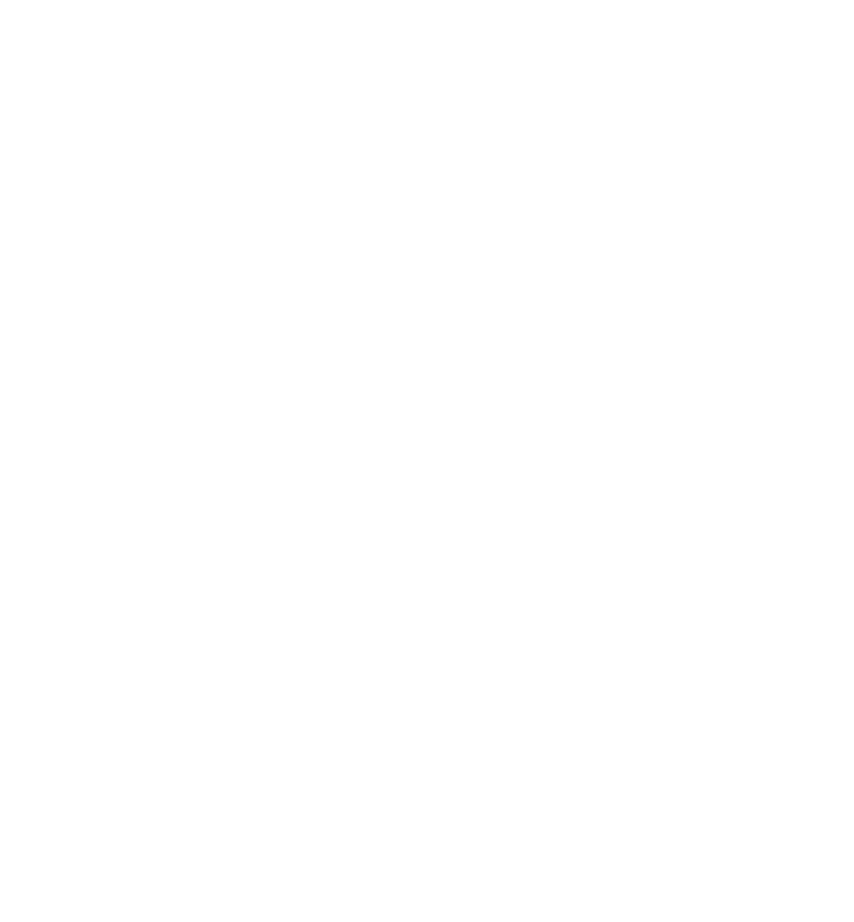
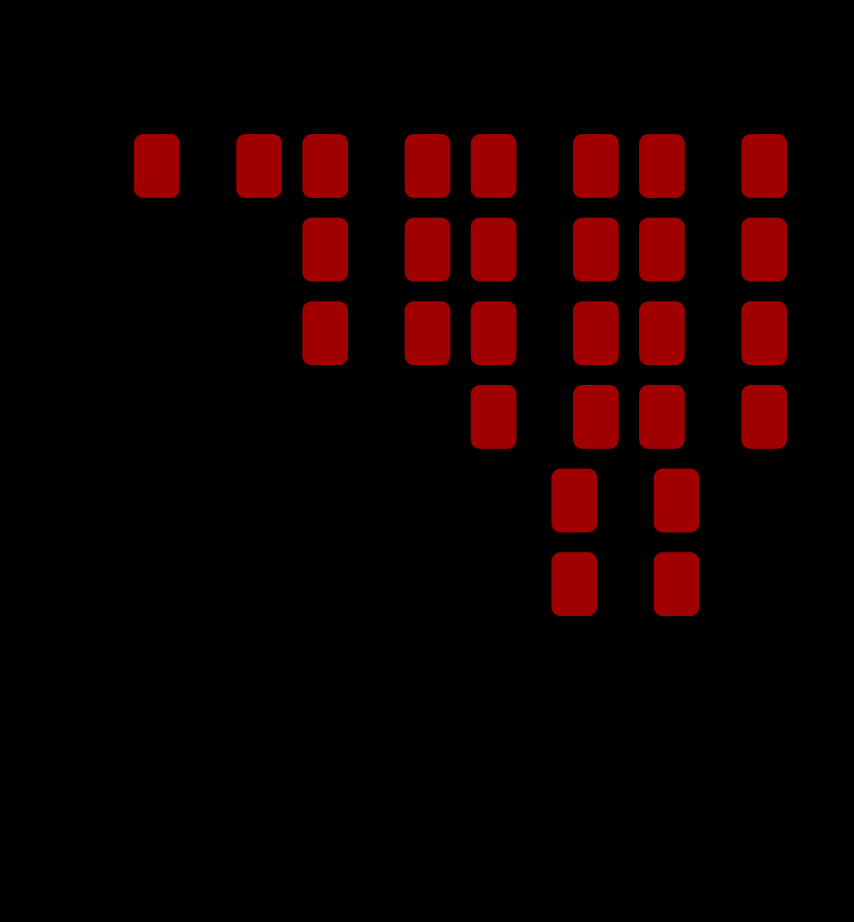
part: none -> (207, 165)
part: none -> (376, 165)
part: none -> (544, 165)
part: none -> (713, 165)
part: none -> (376, 249)
part: none -> (544, 249)
part: none -> (713, 249)
part: none -> (376, 333)
part: none -> (544, 333)
part: none -> (713, 333)
part: none -> (544, 416)
part: none -> (713, 416)
part: none -> (625, 500)
part: none -> (625, 584)

